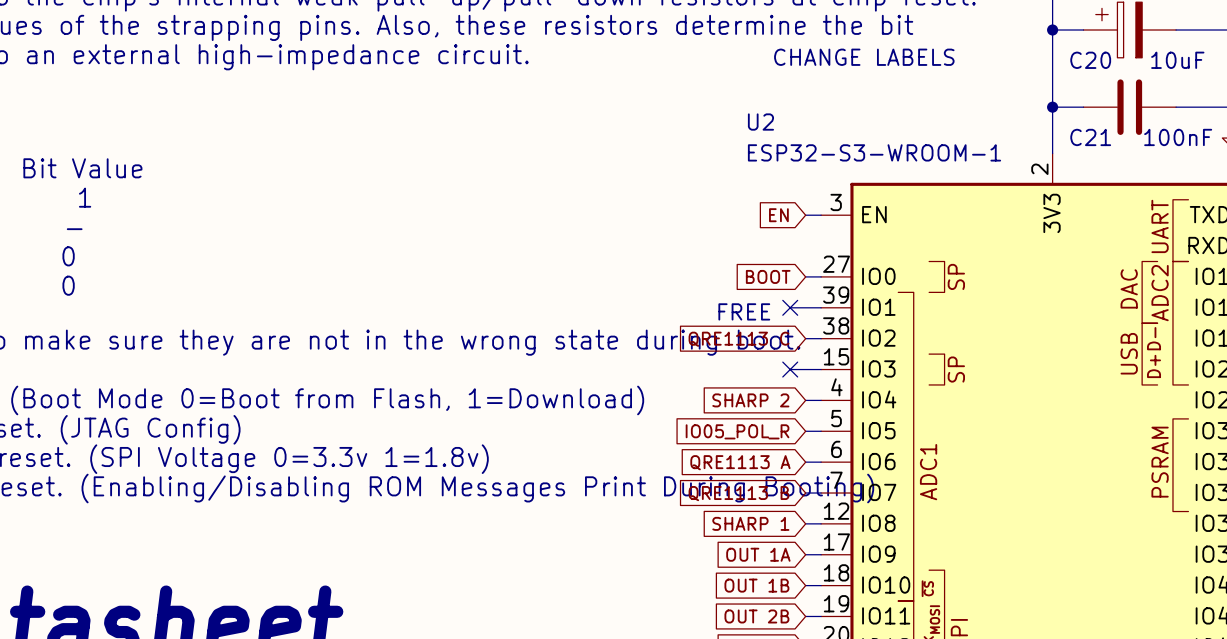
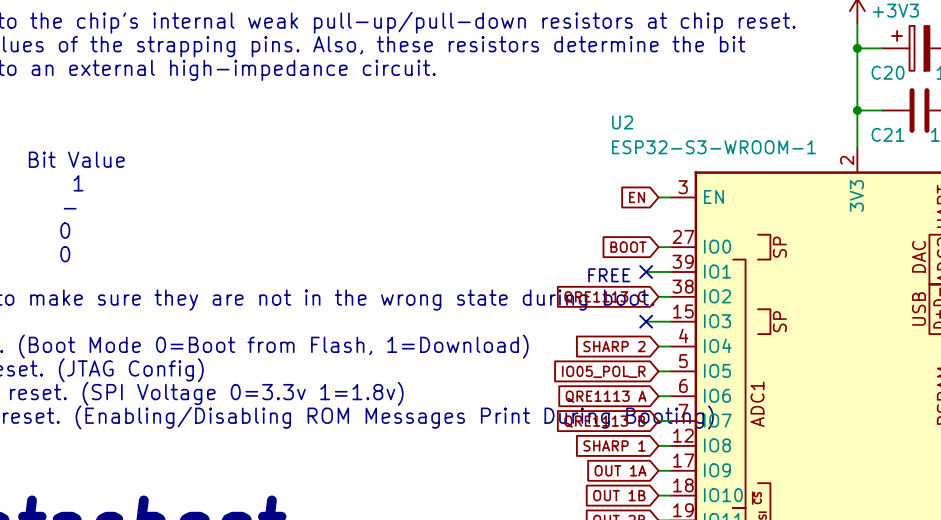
text: CHANGE LABELS (864, 57) -> none

